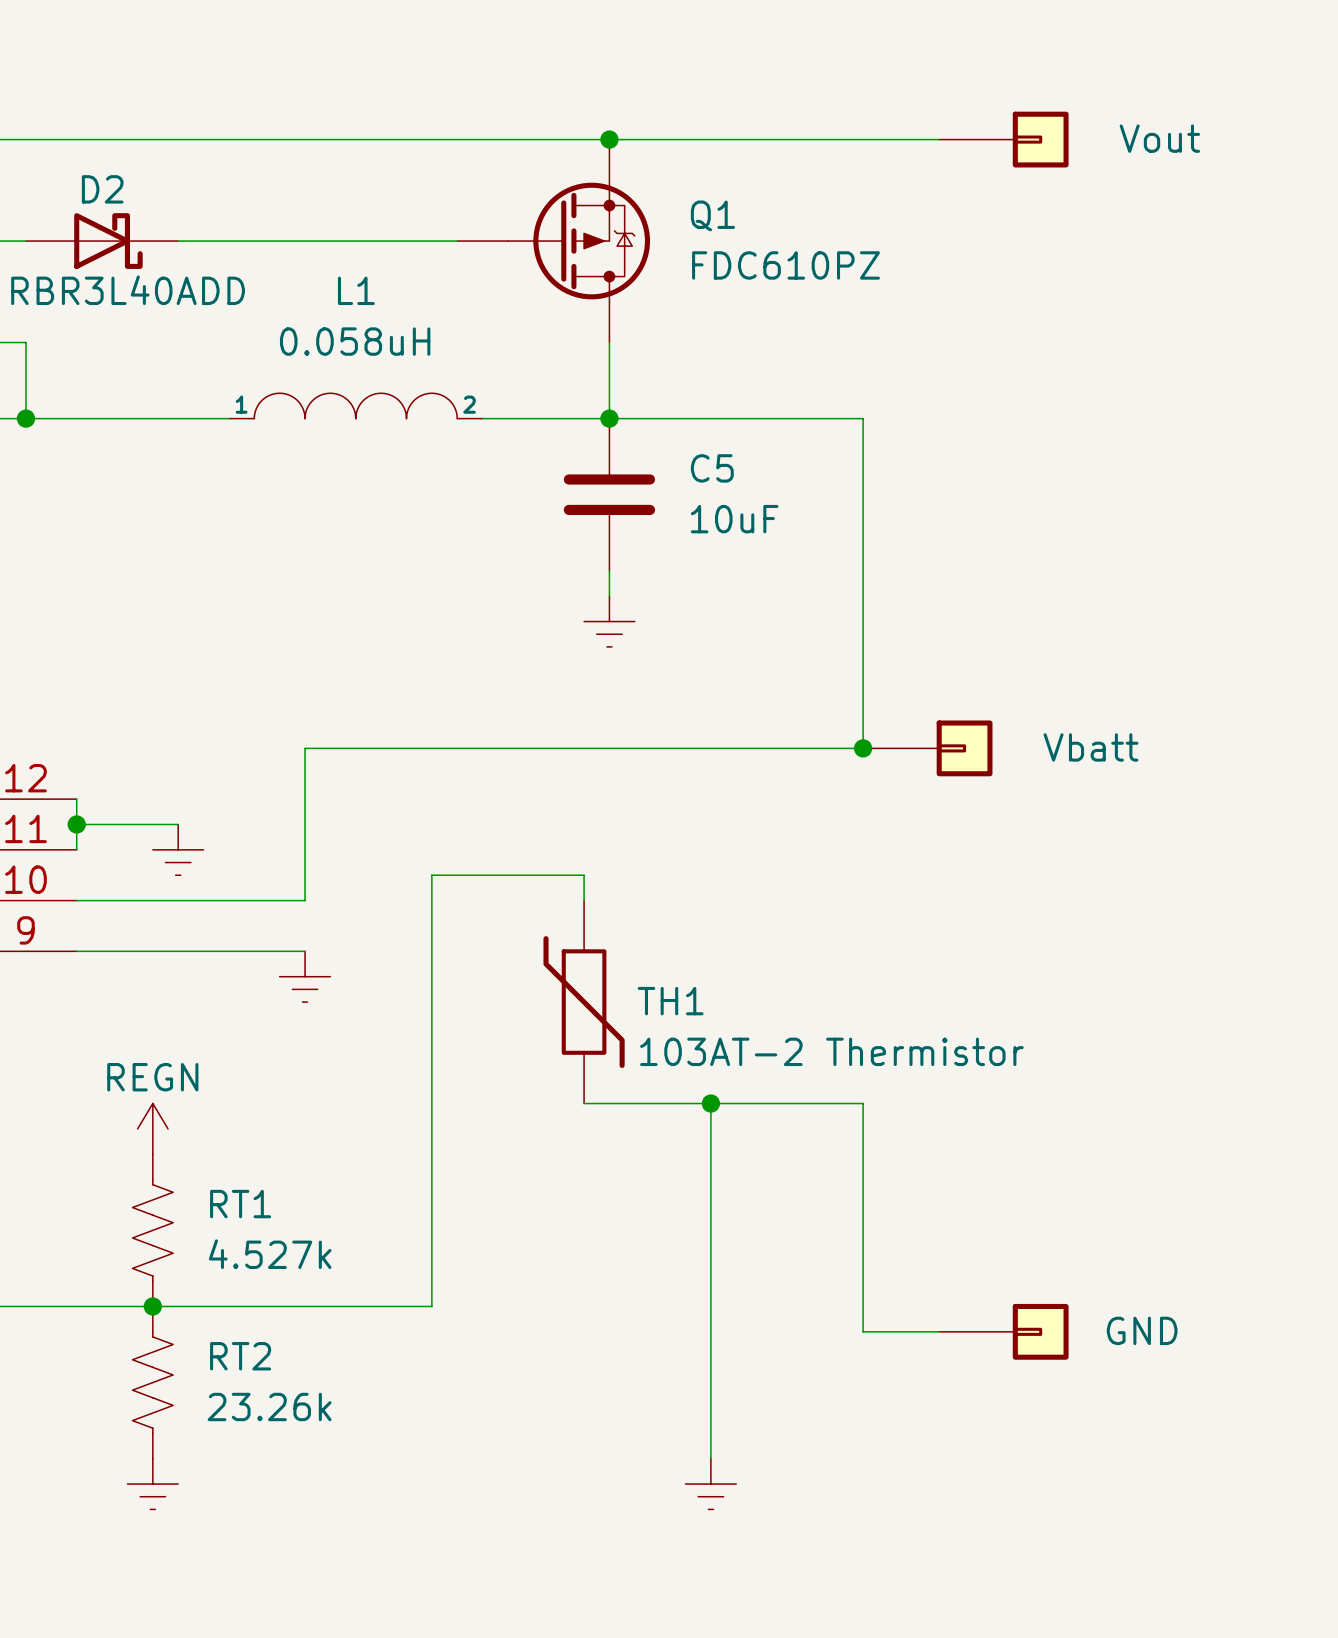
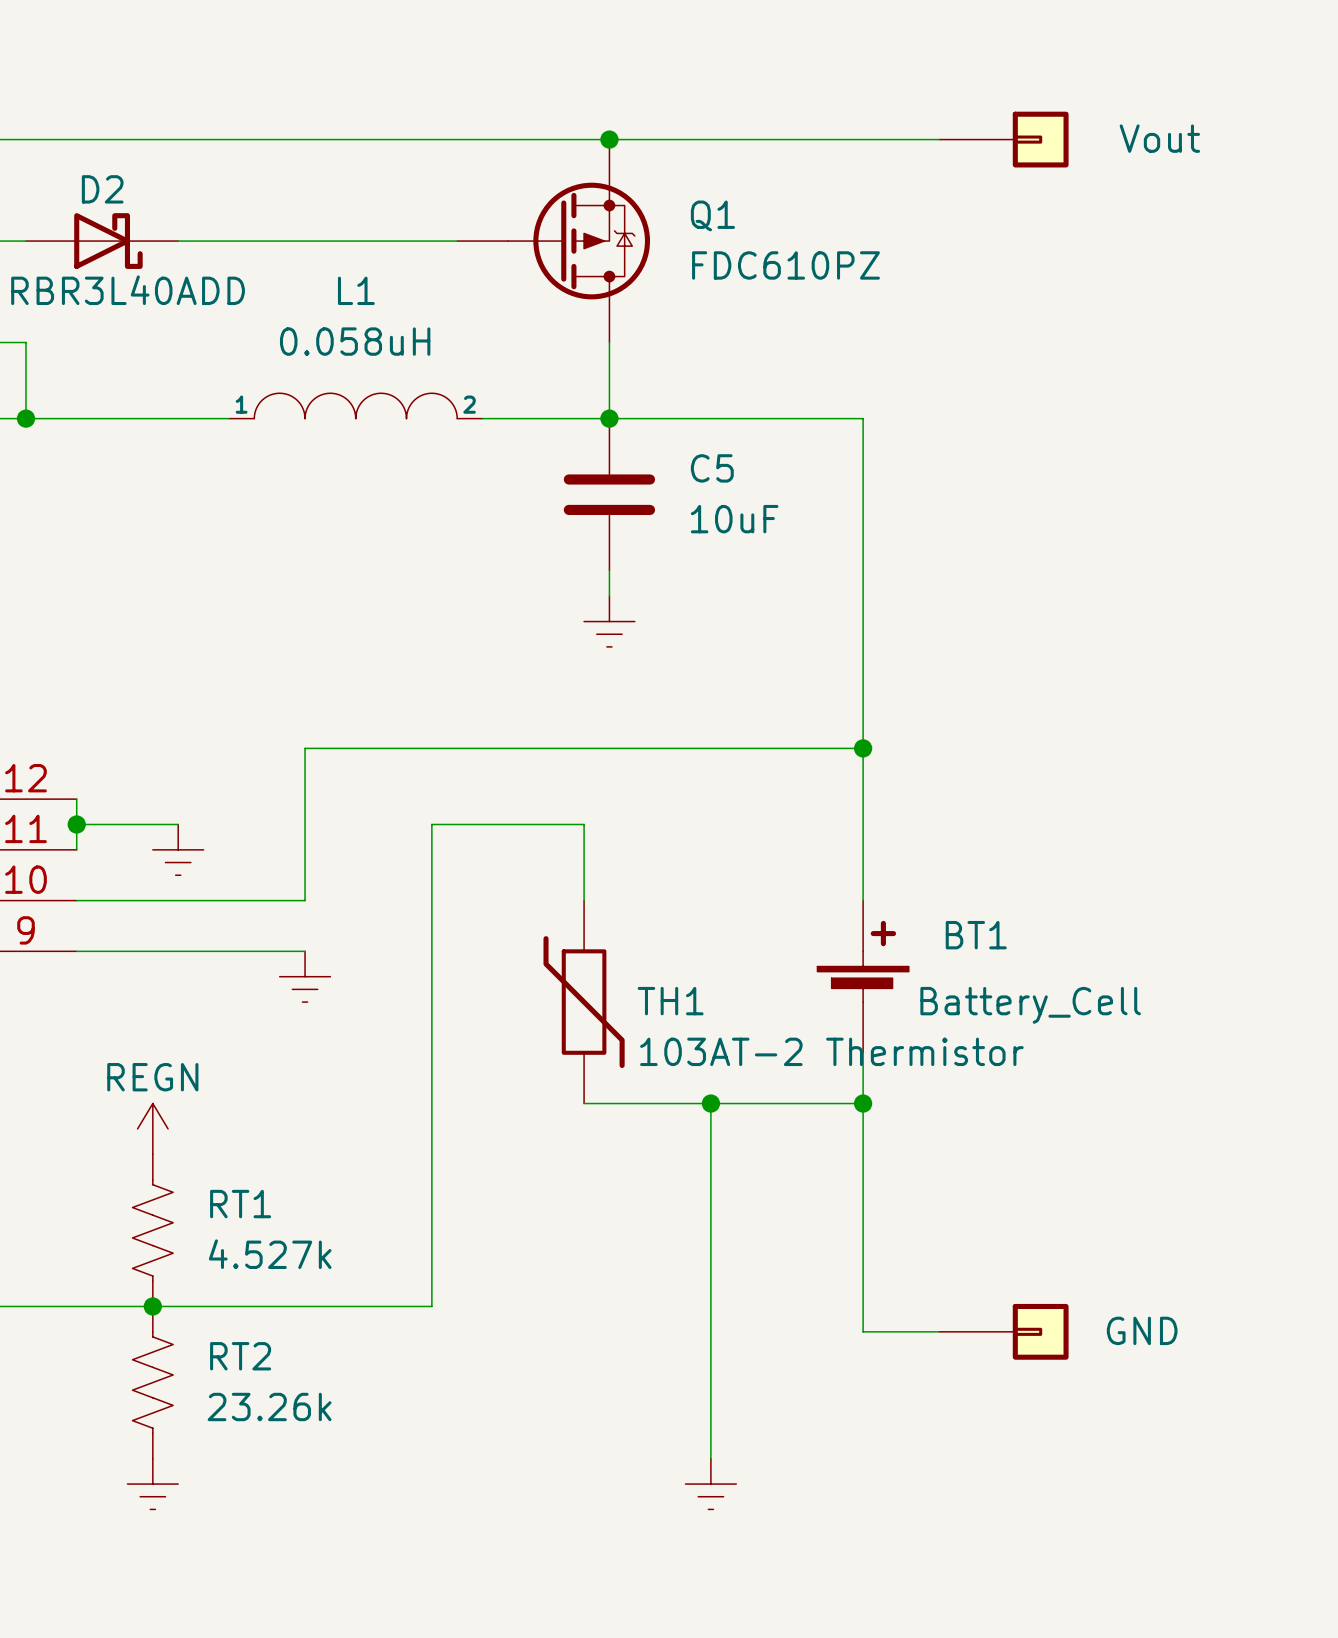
wire: none -> (863, 748) (863, 900)
part: Vbatt (927, 748) -> none
wire: (431, 875) (584, 875) -> (431, 875) (431, 824) (584, 824) (584, 875)
BT1: none -> Battery_Cell (863, 976)
wire: none -> (863, 1052) (863, 1103)
junction: none -> (863, 1103)

